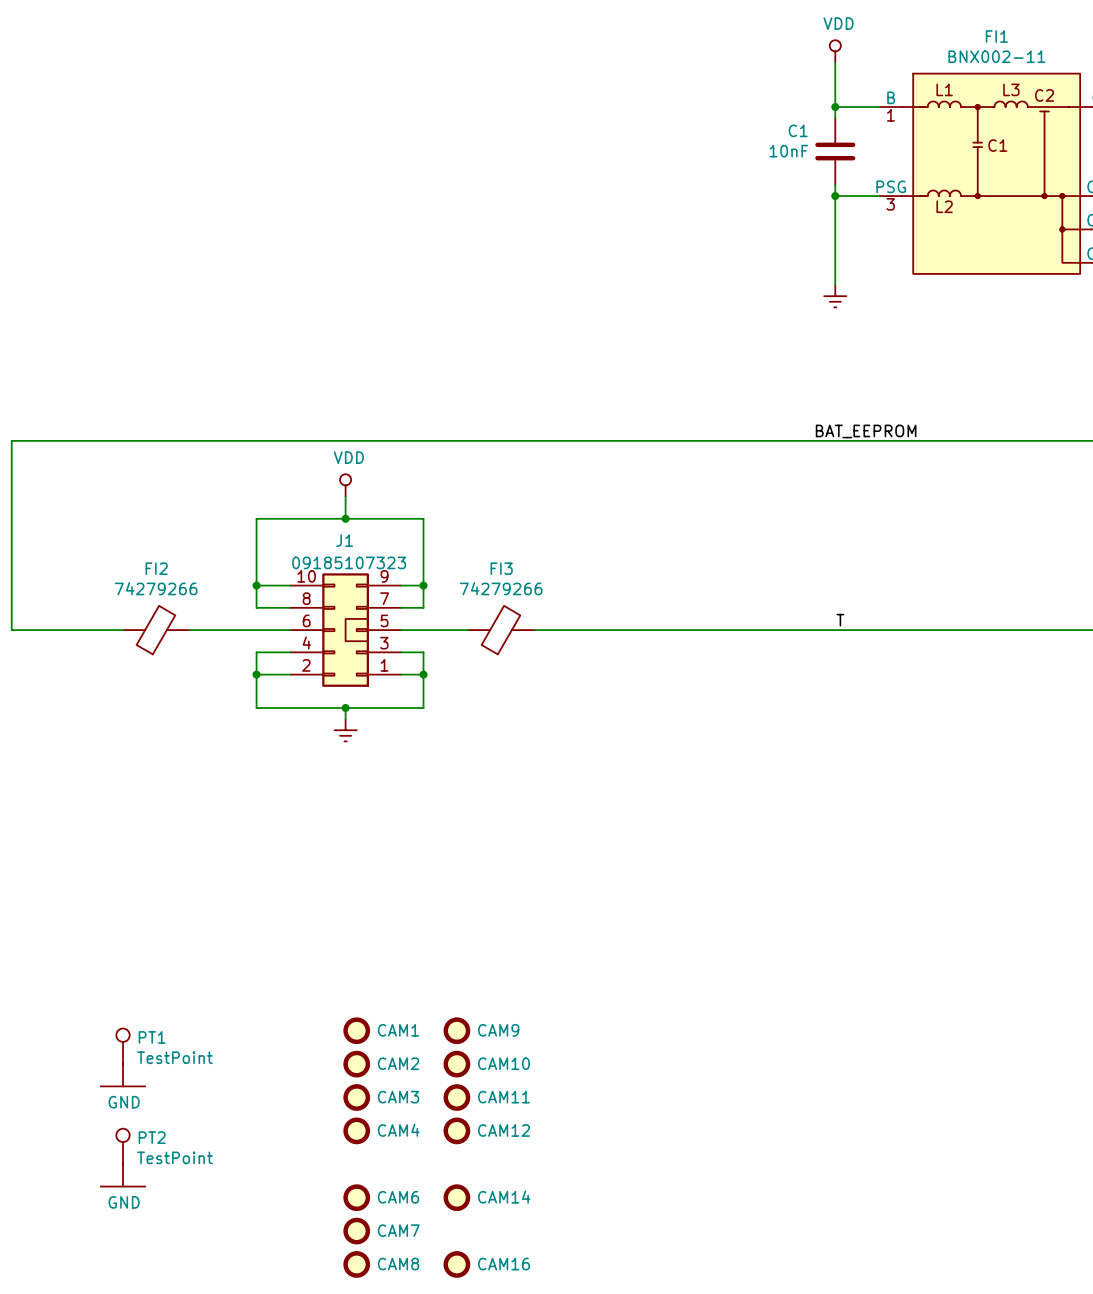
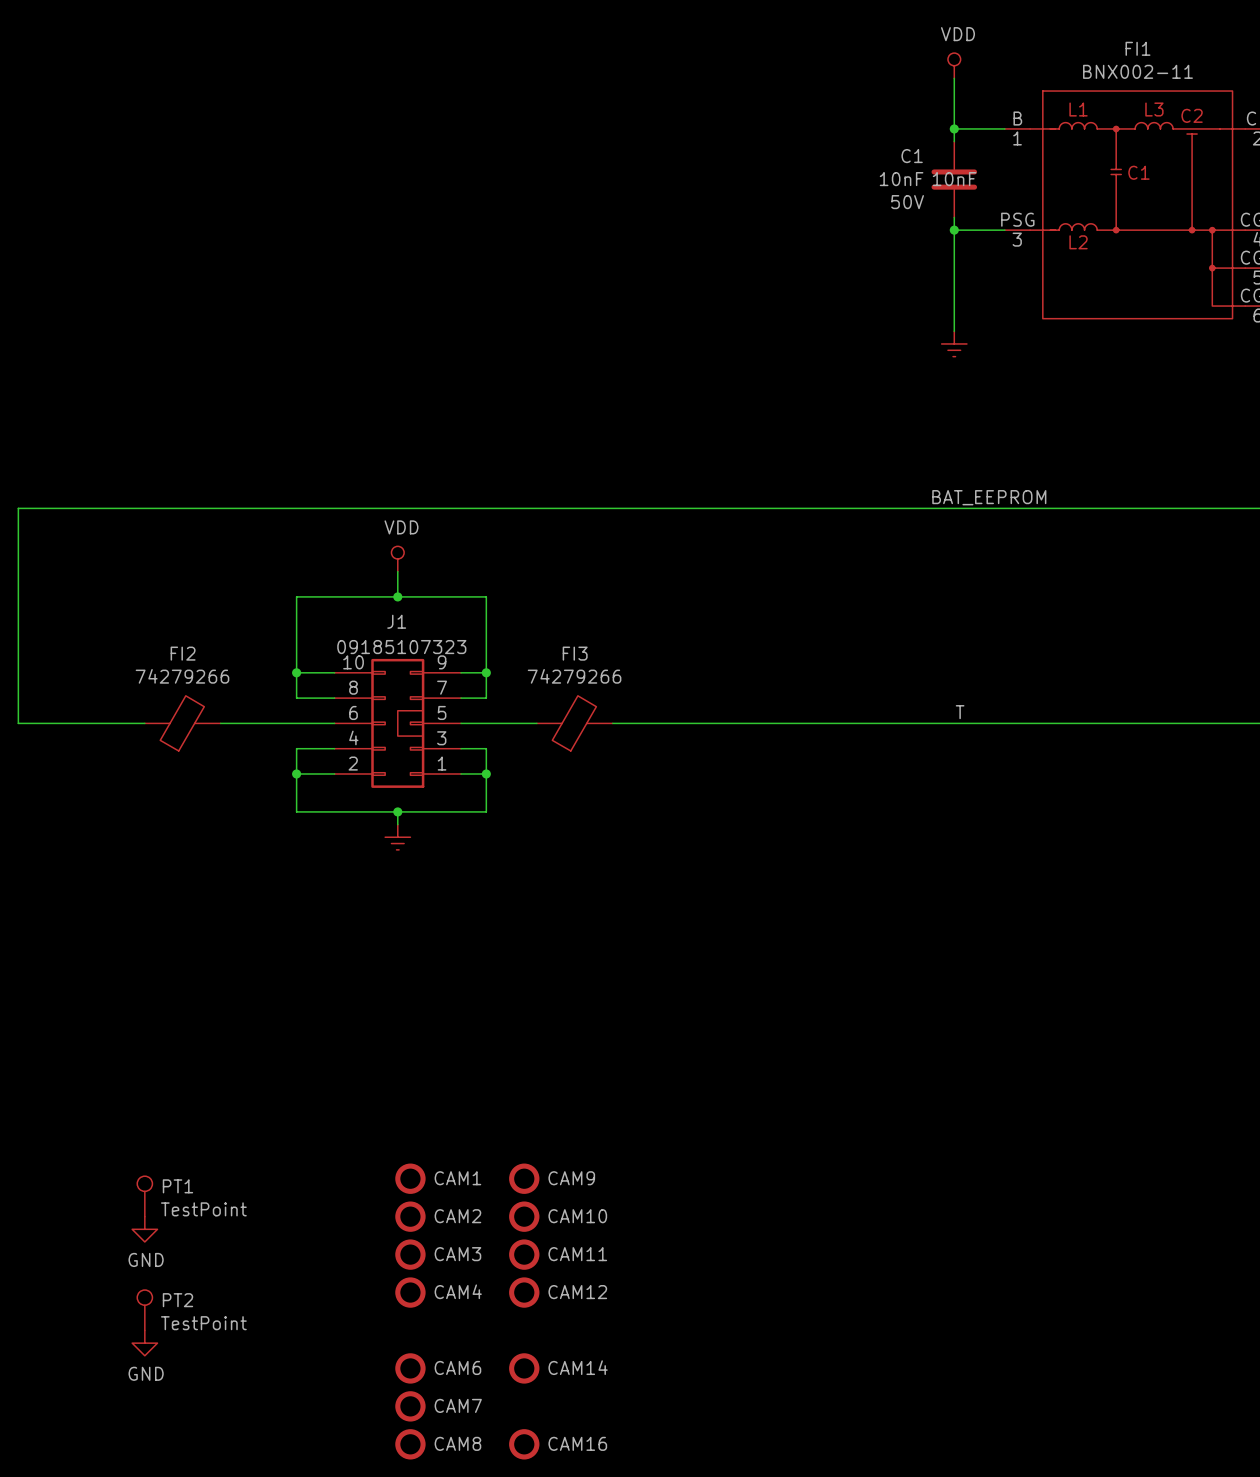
C1 text: none -> 10nF (954, 179)
C1 text: none -> 50V (907, 202)
power symbol shape: [100, 1064, 146, 1087] -> [132, 1216, 158, 1242]
power symbol shape: [100, 1164, 146, 1187] -> [132, 1330, 158, 1356]

